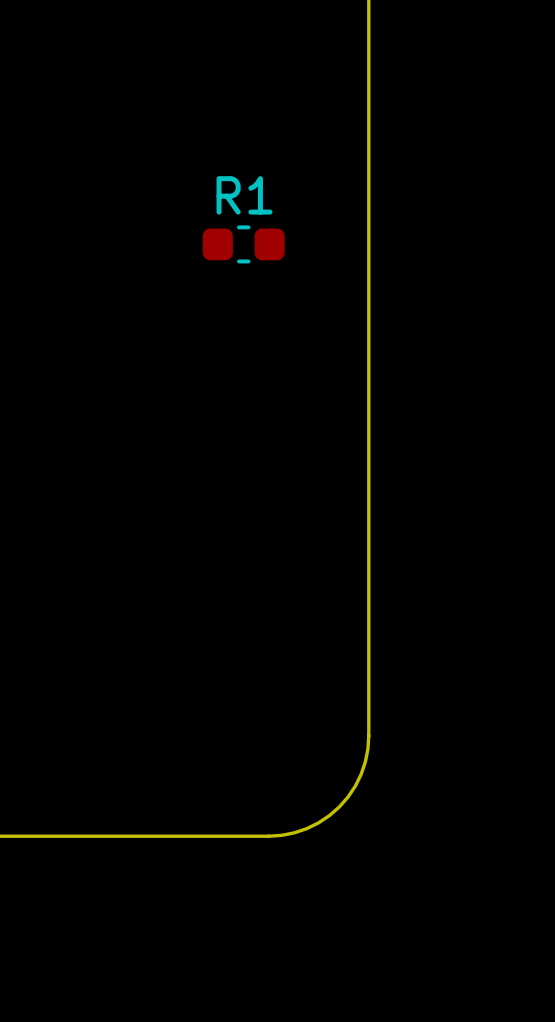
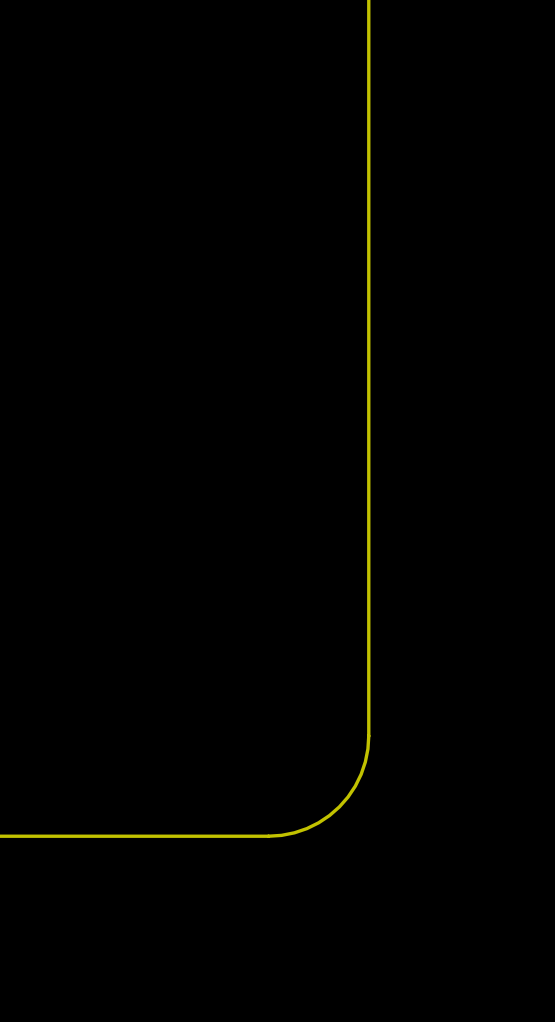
R1: (243, 244) -> none

